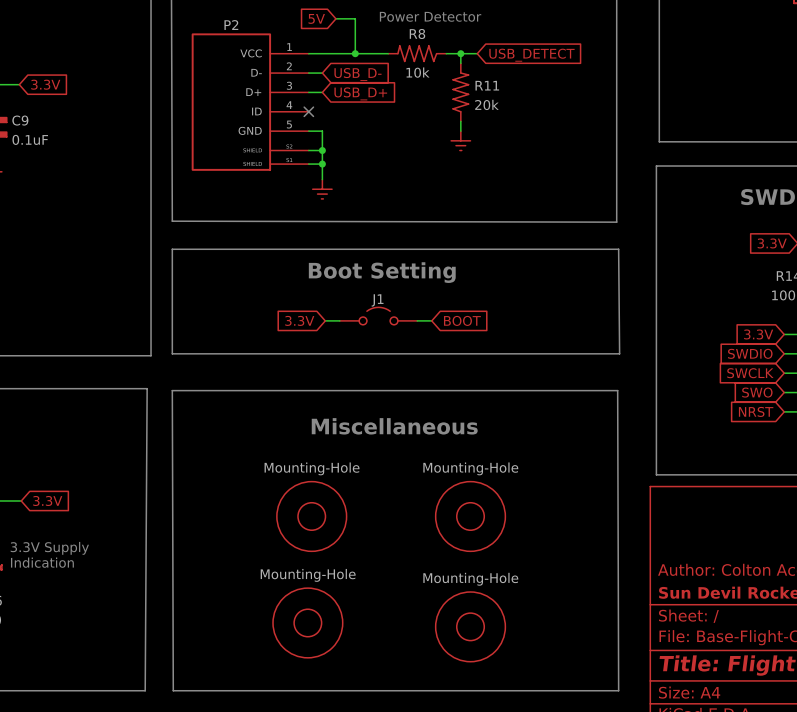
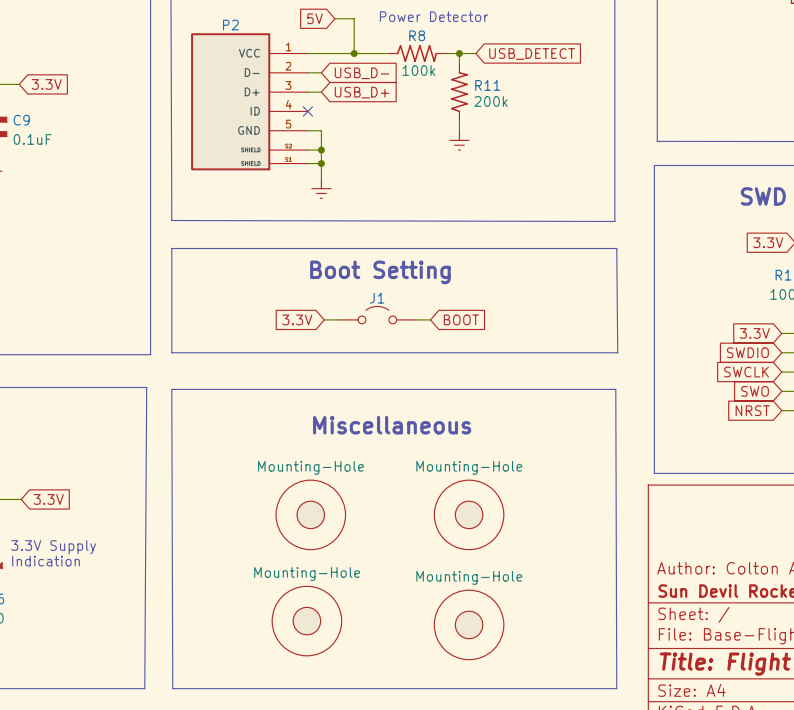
R8 rotation: 0° (417, 53) -> 180° (416, 53)
R8 value: 10k (417, 72) -> 100k (418, 70)
R11 value: 20k (486, 104) -> 200k (490, 101)

